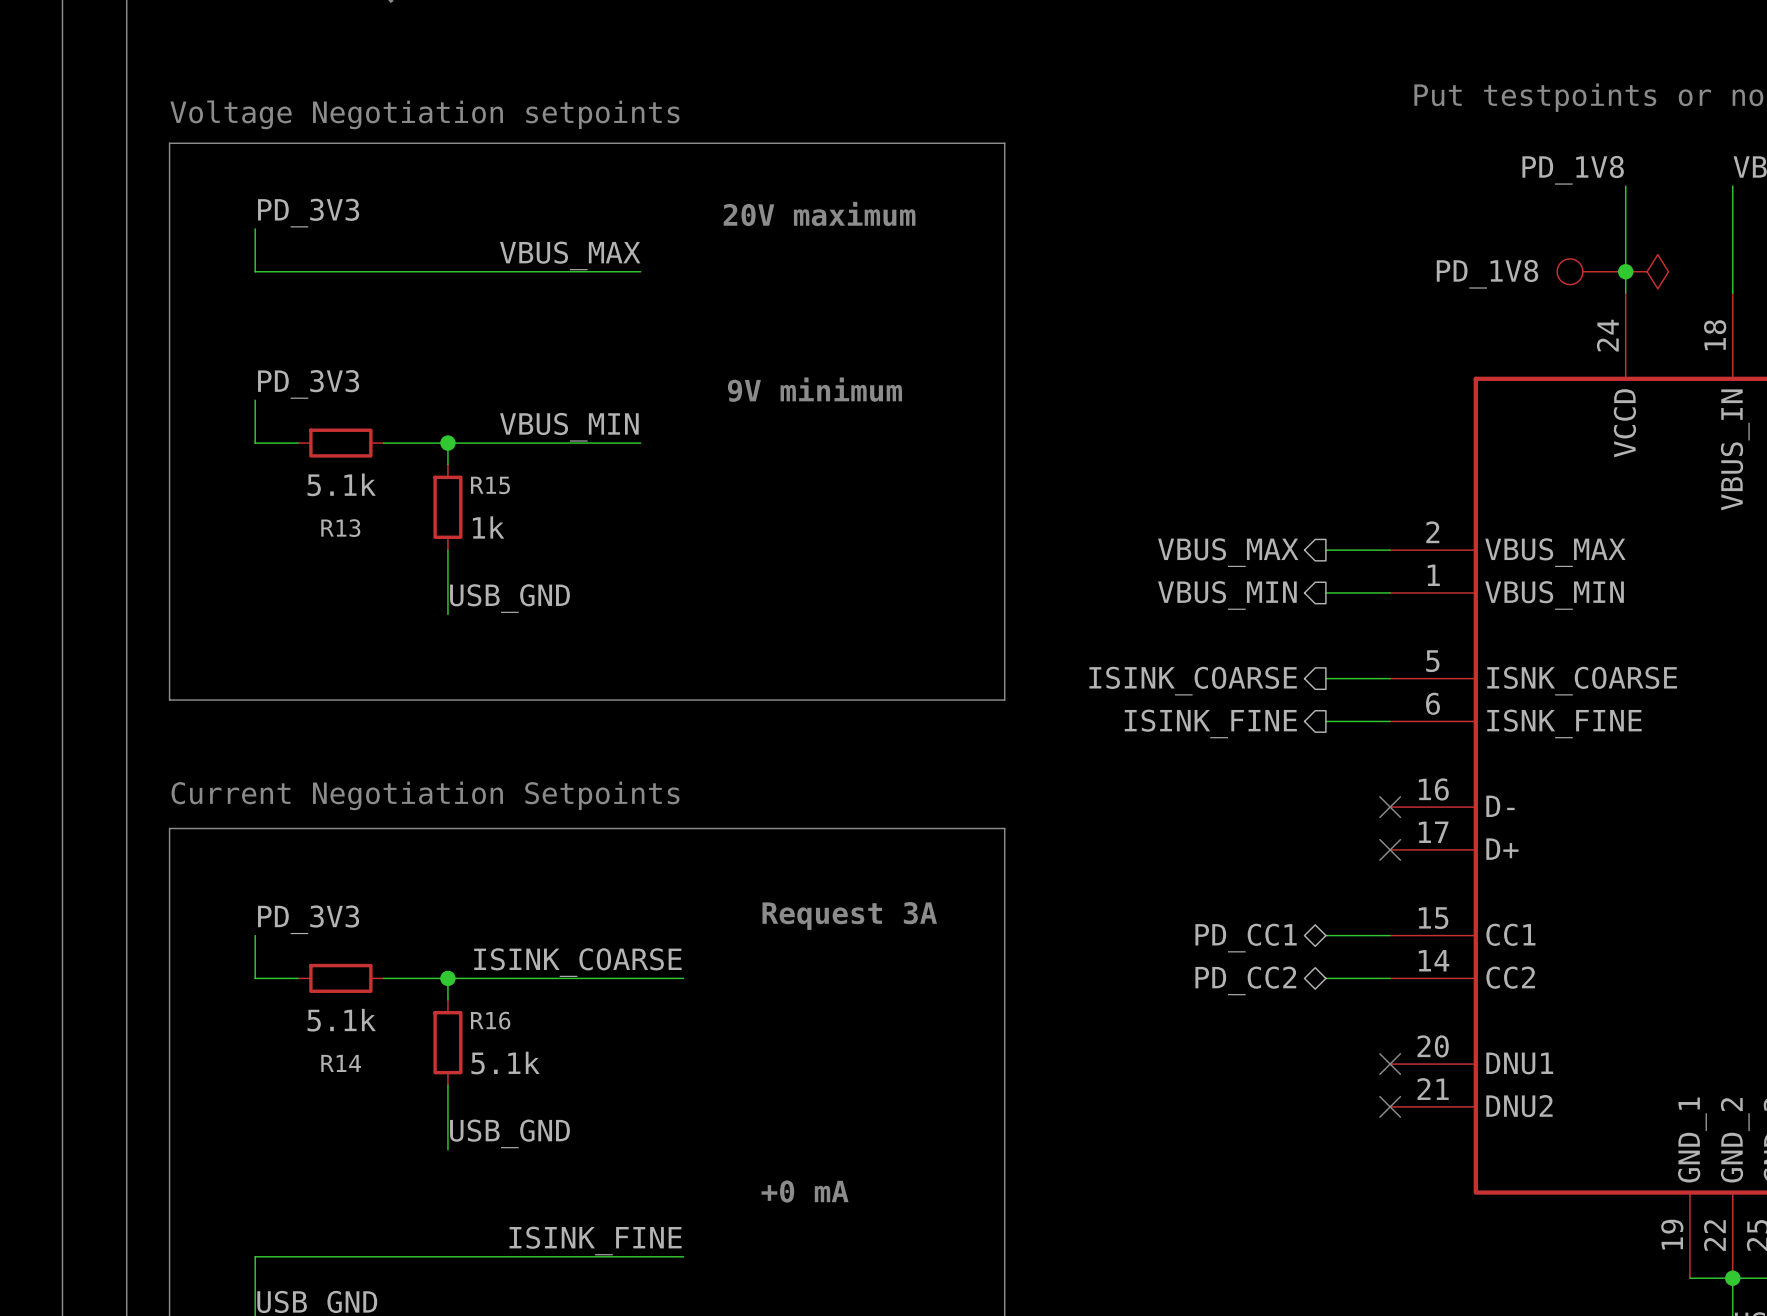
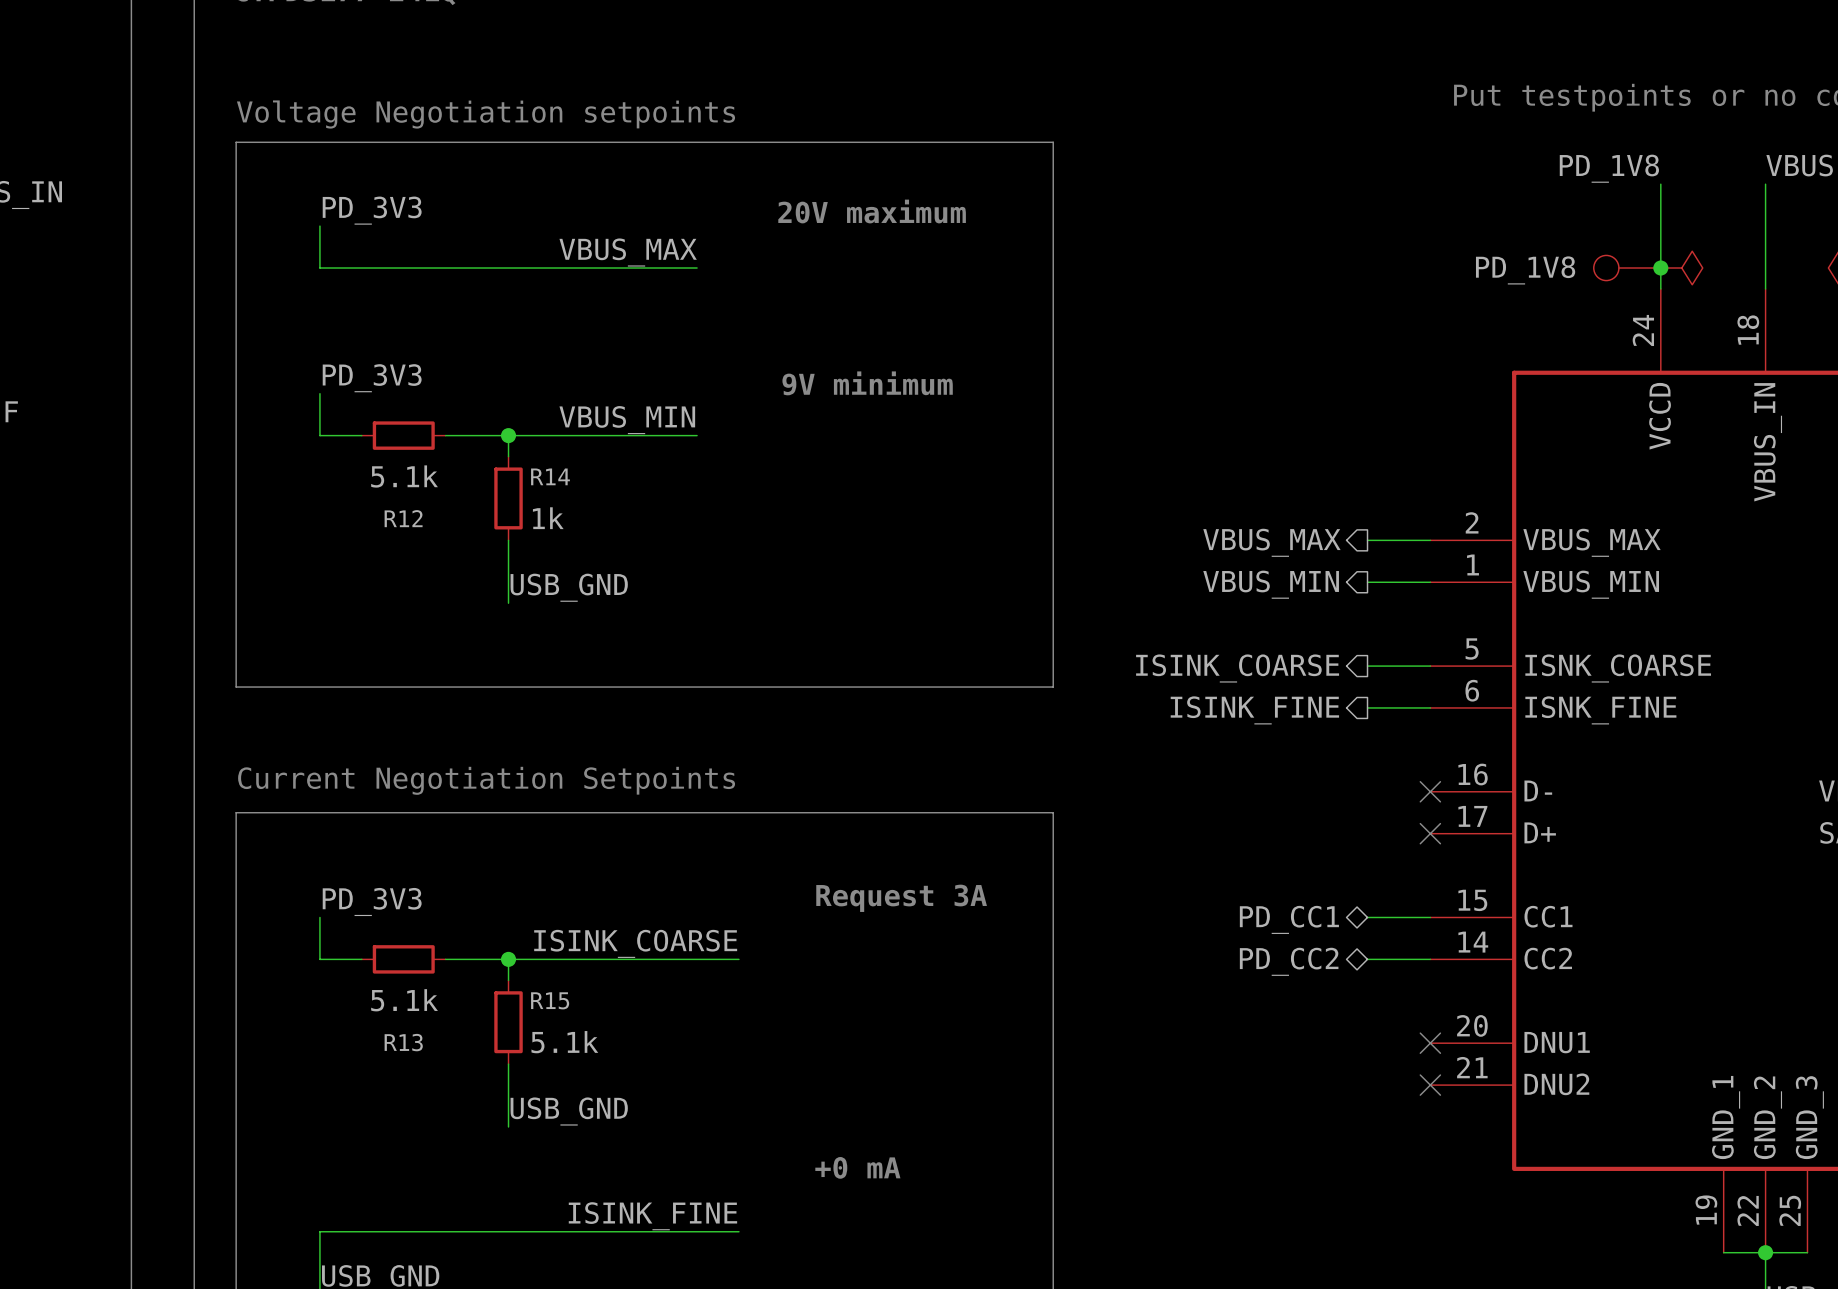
R15 name: R15 (490, 485) -> R14 (550, 476)
R13 name: R13 (340, 528) -> R12 (403, 518)
R16 name: R16 (490, 1020) -> R15 (550, 1000)
R14 name: R14 (341, 1063) -> R13 (403, 1042)

